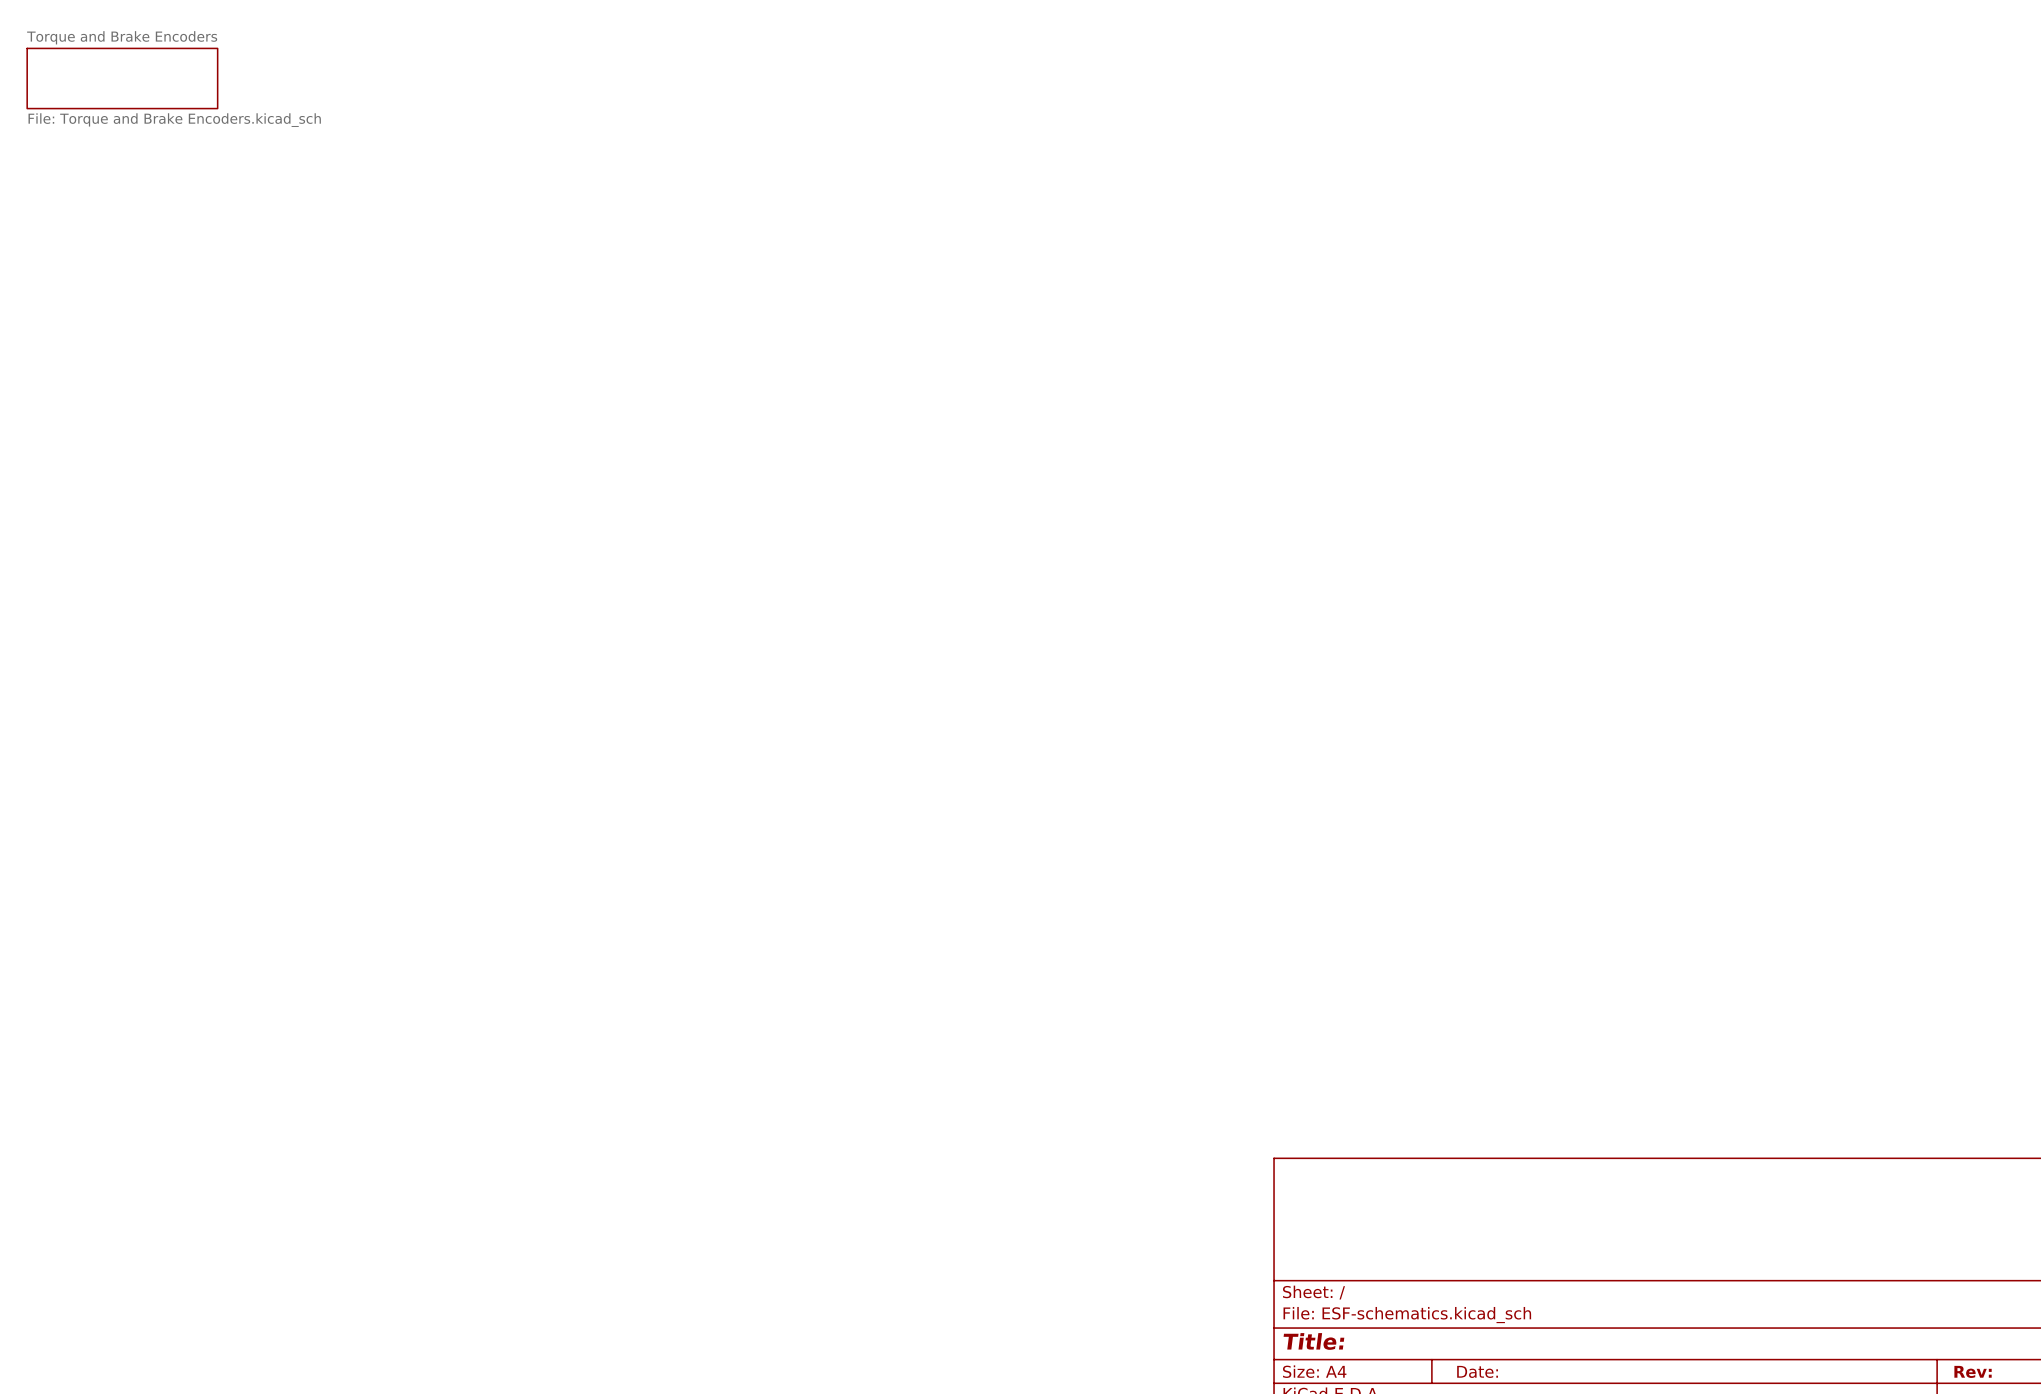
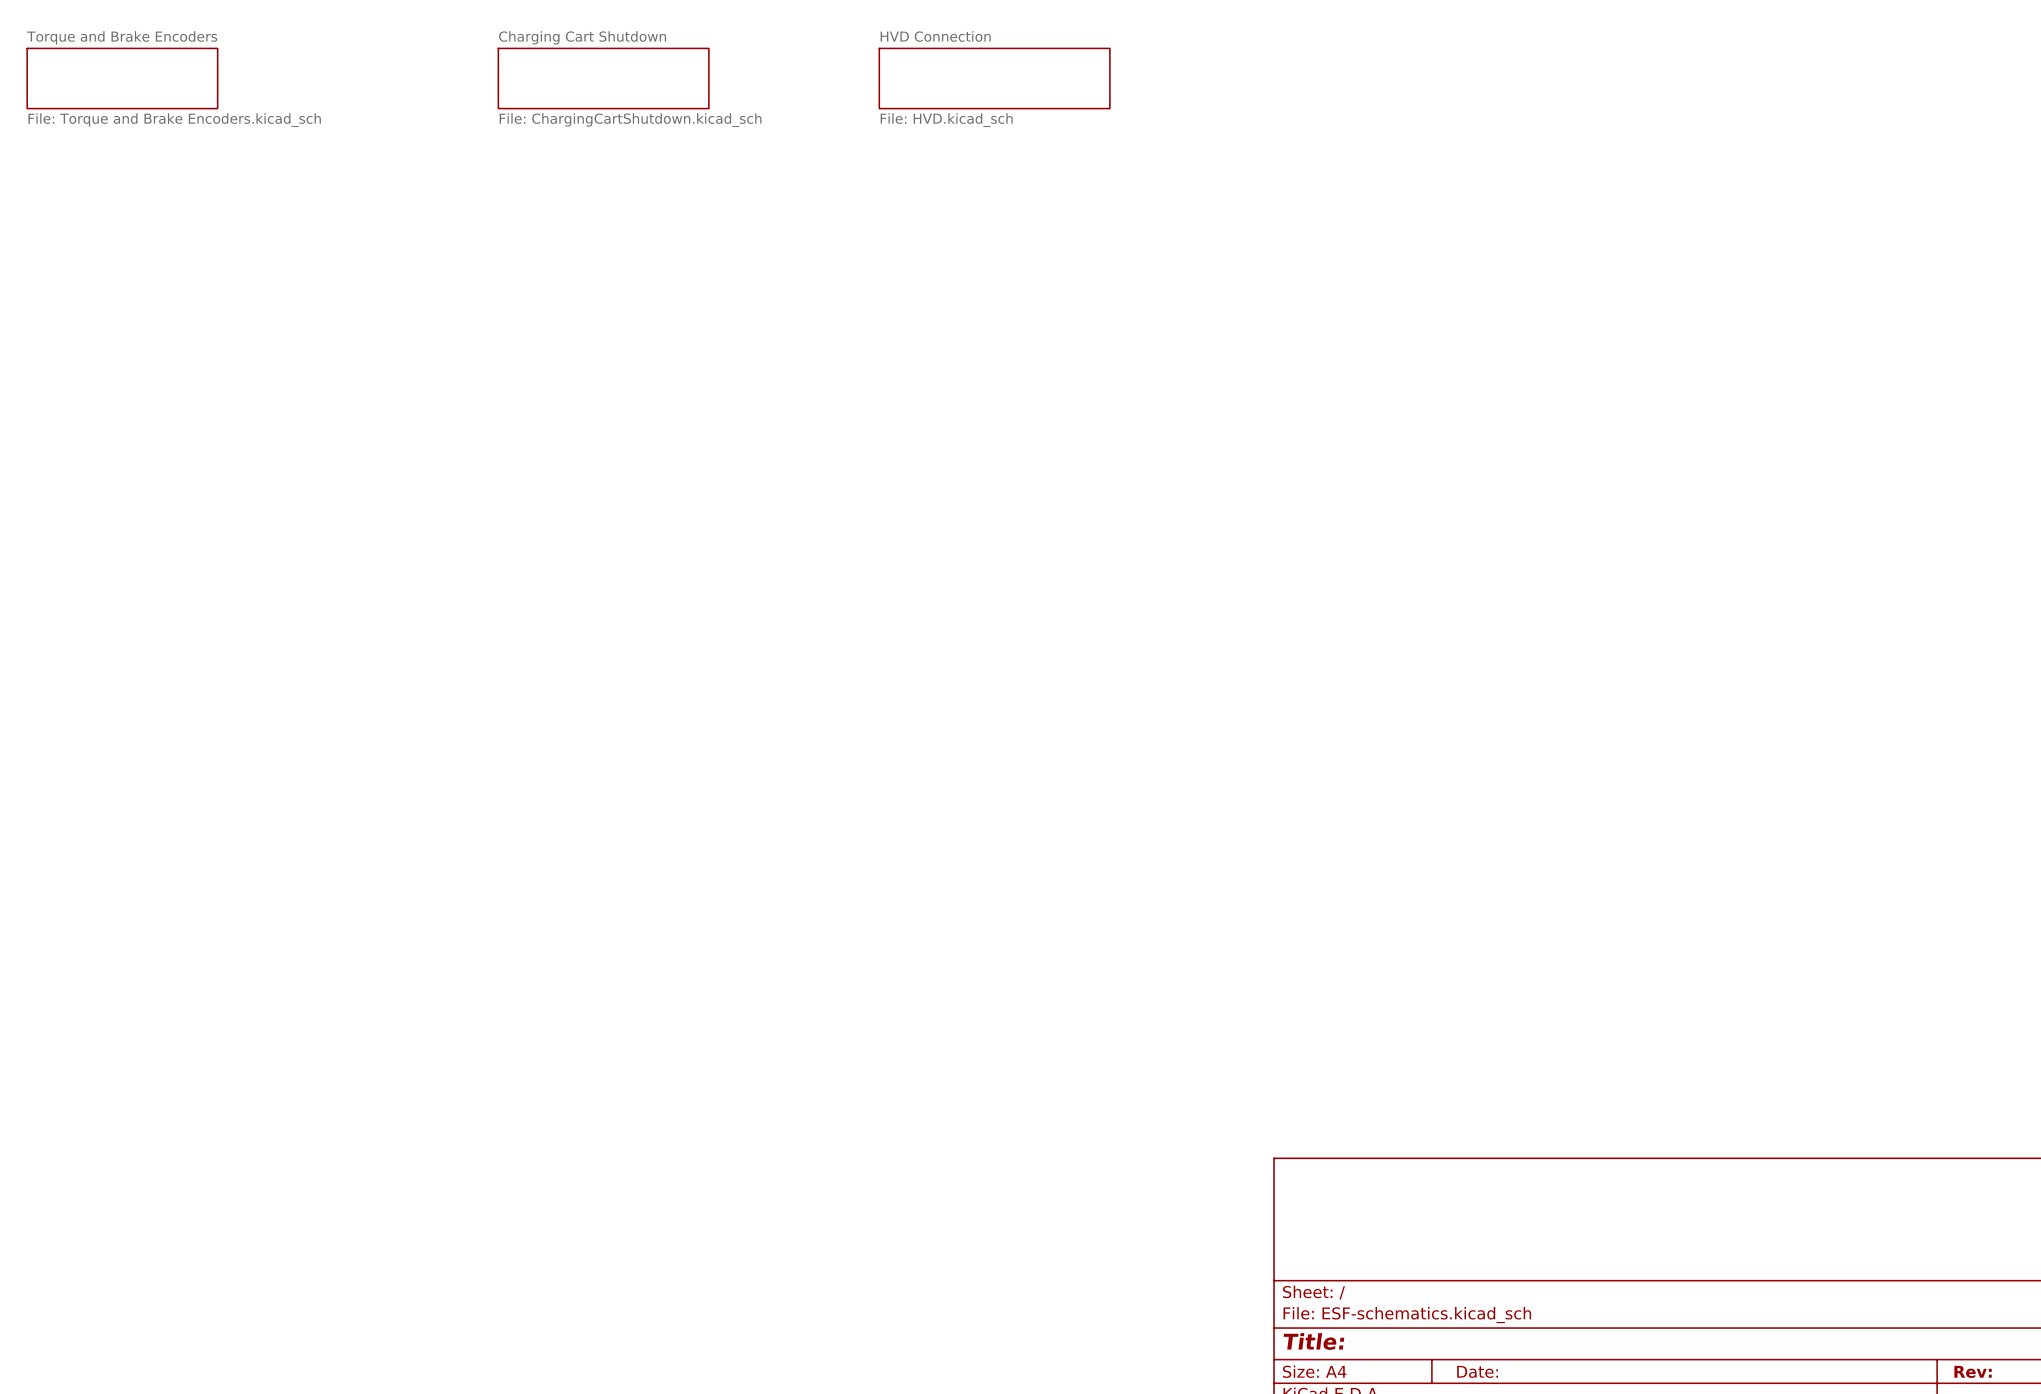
sheet Charging Cart Shutdown: none -> File: ChargingCartShutdown.kicad_sch (603, 78)
sheet HVD Connection: none -> File: HVD.kicad_sch (994, 78)

